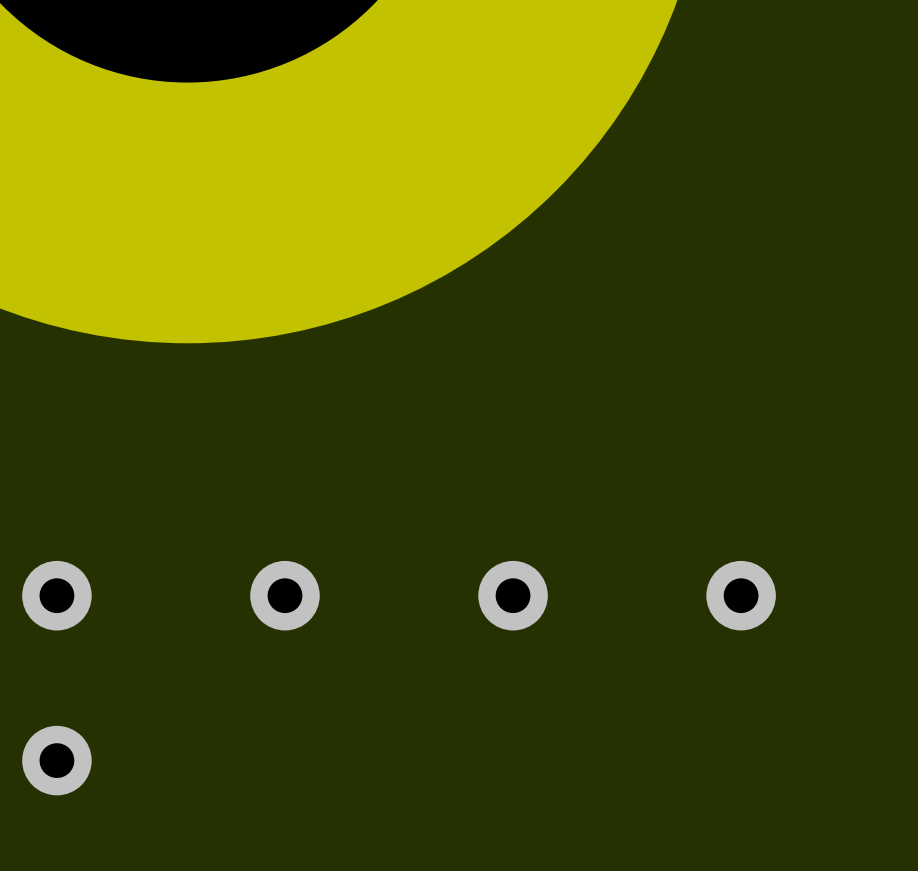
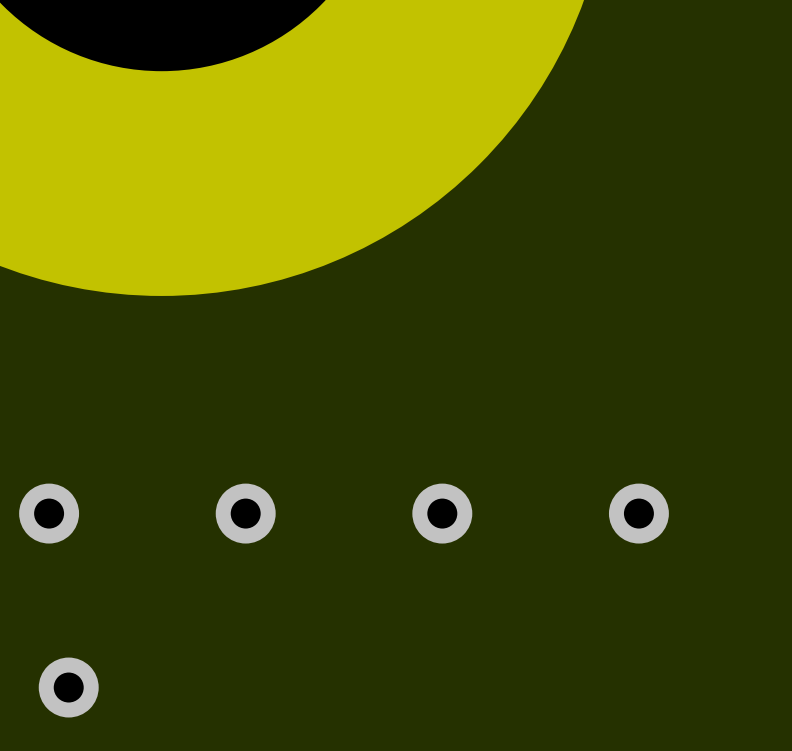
via position: (56, 760) -> (68, 687)

